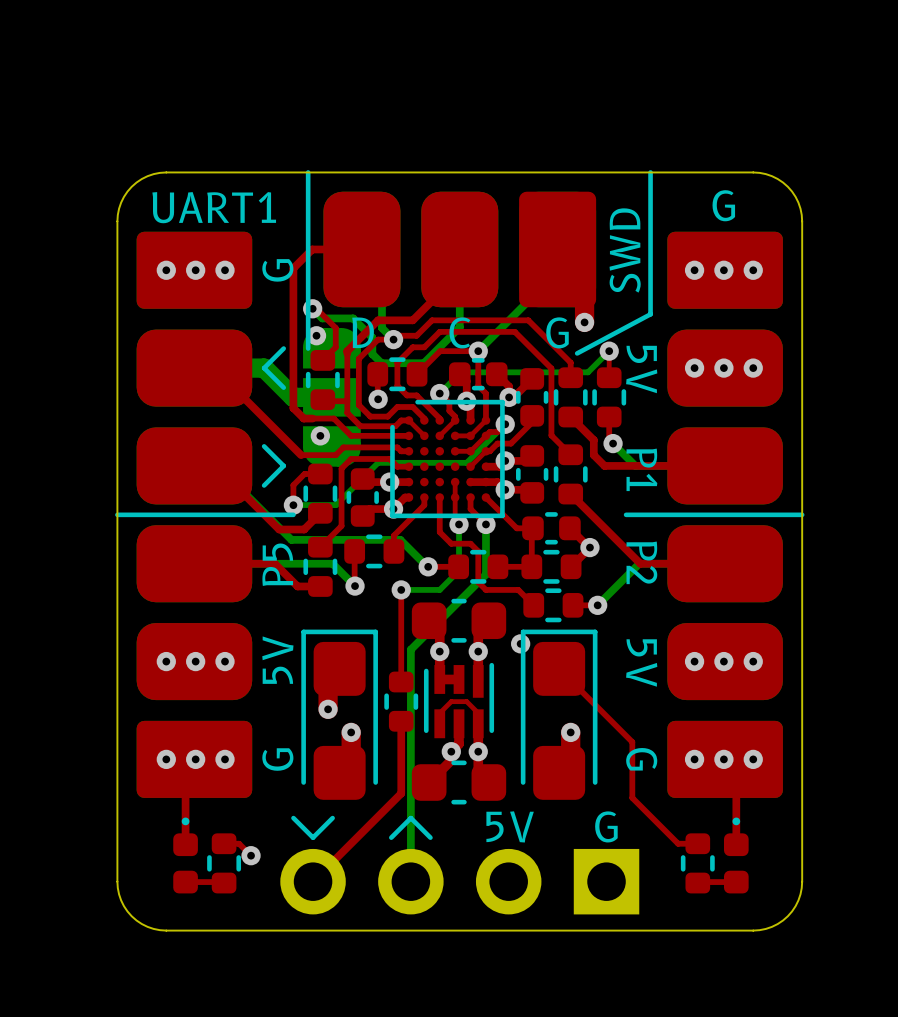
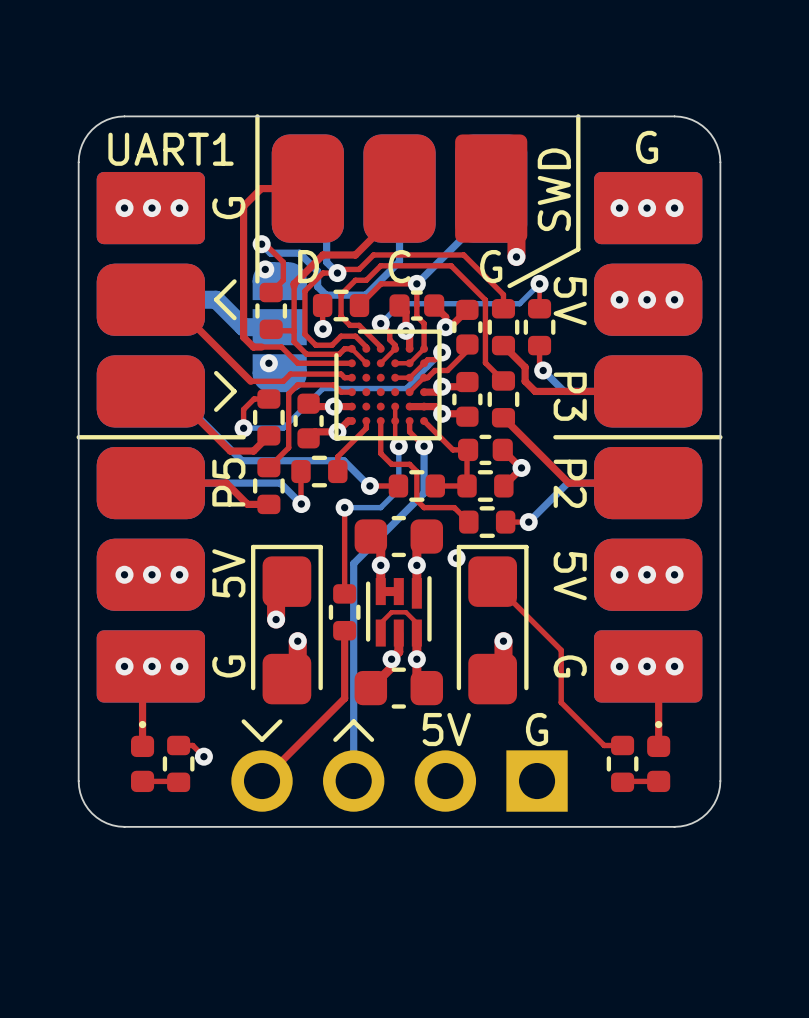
text: P1 (641, 469) -> P3 (570, 396)

